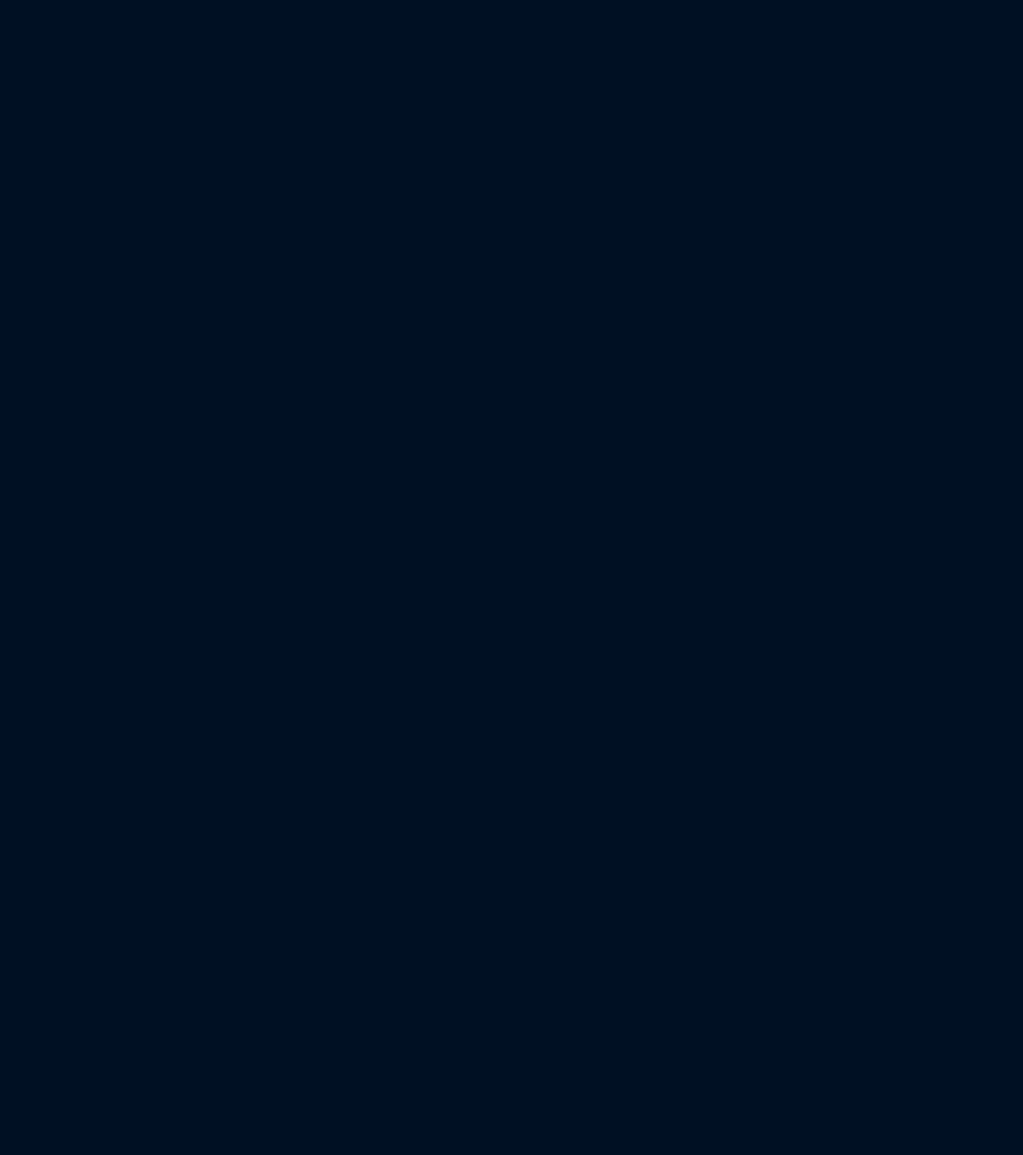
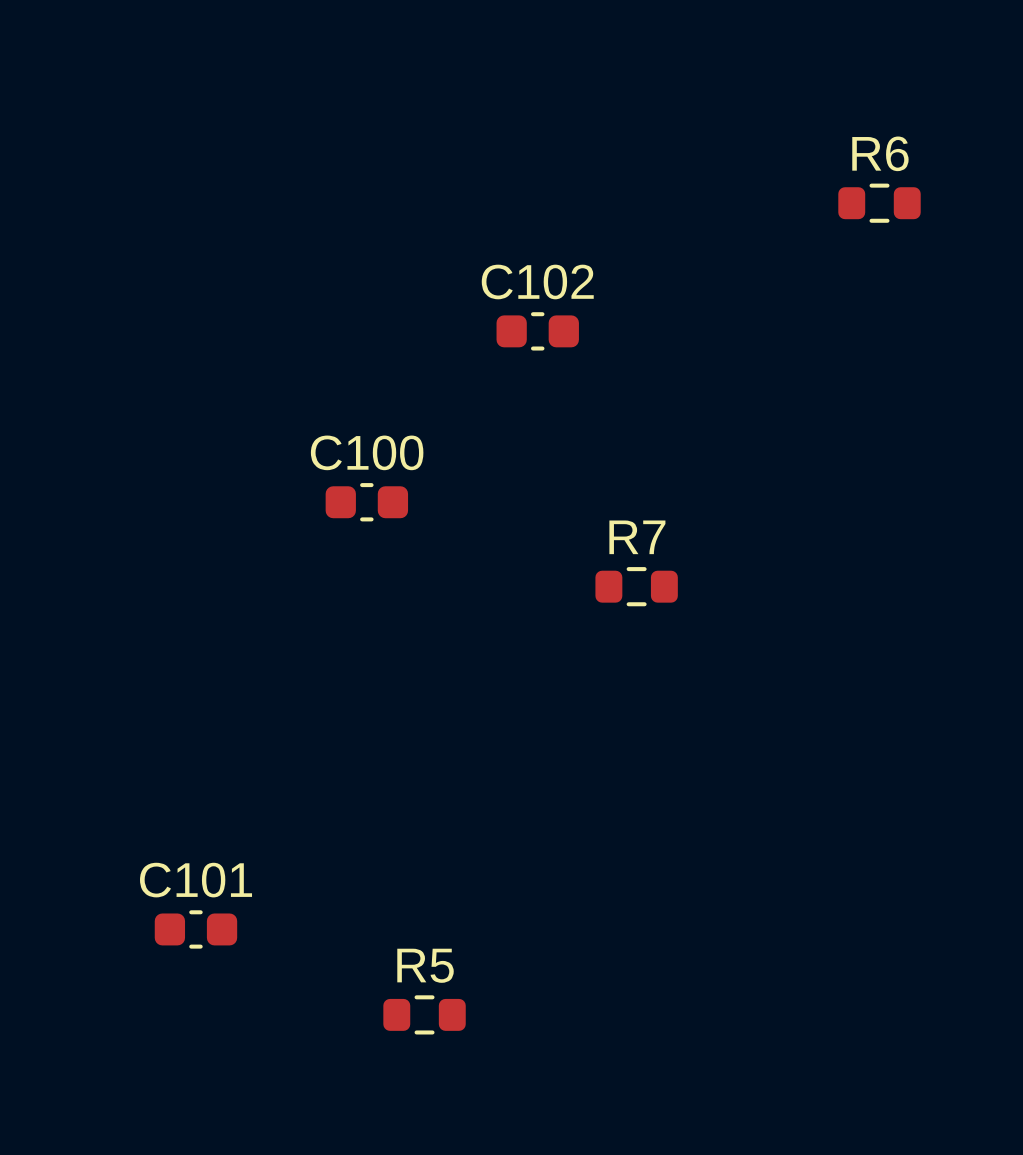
R6: none -> (879, 203)
C102: none -> (537, 331)
C100: none -> (366, 502)
R7: none -> (636, 586)
C101: none -> (195, 929)
R5: none -> (424, 1014)

